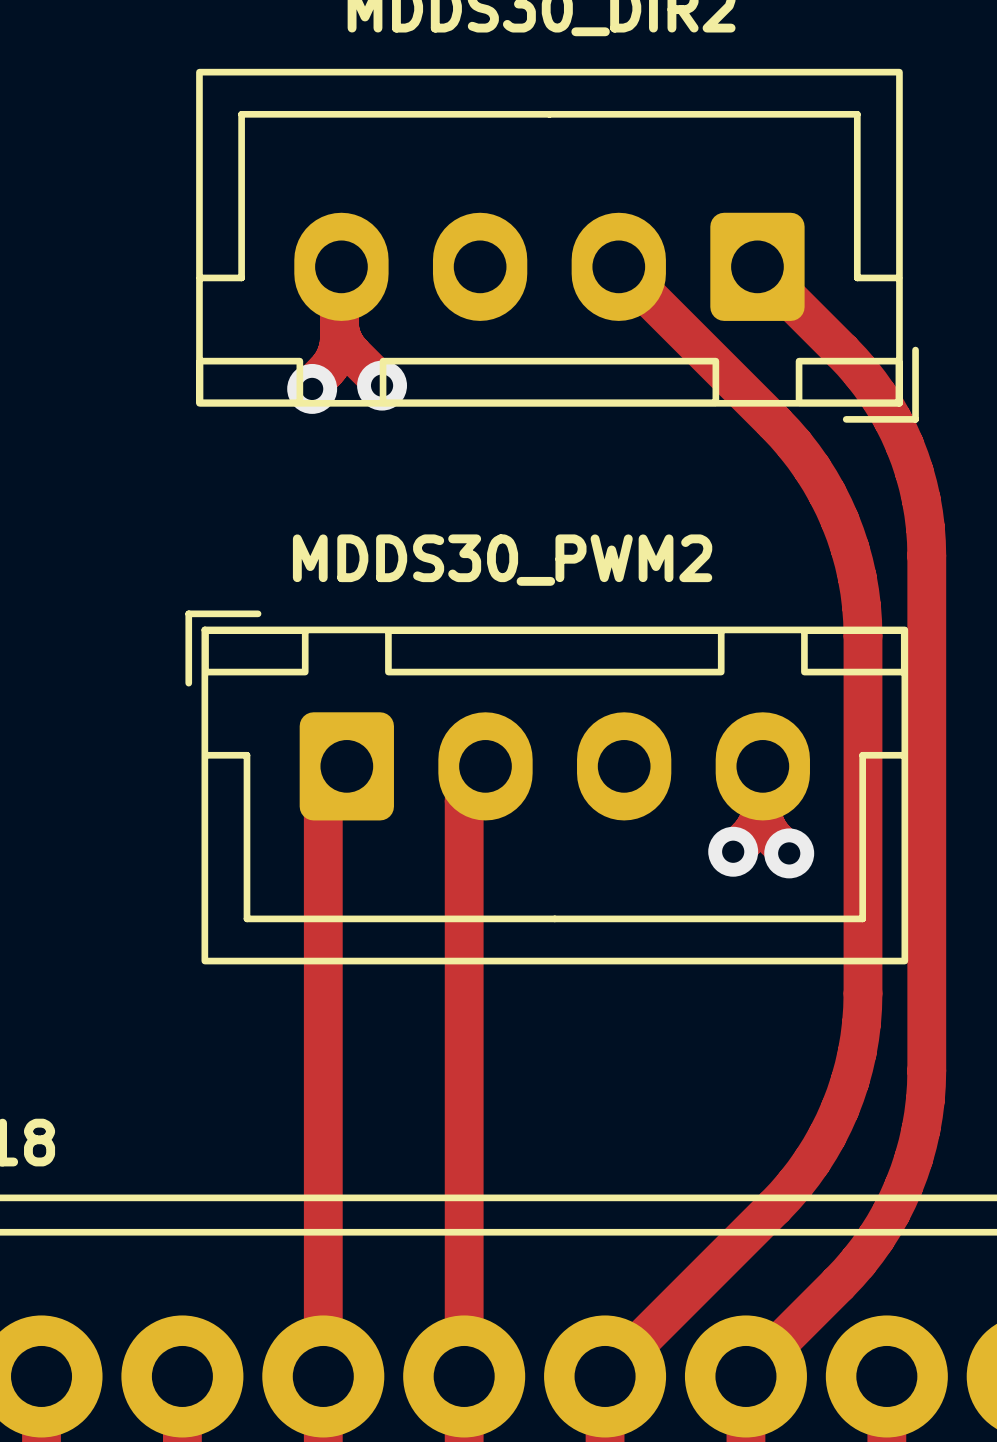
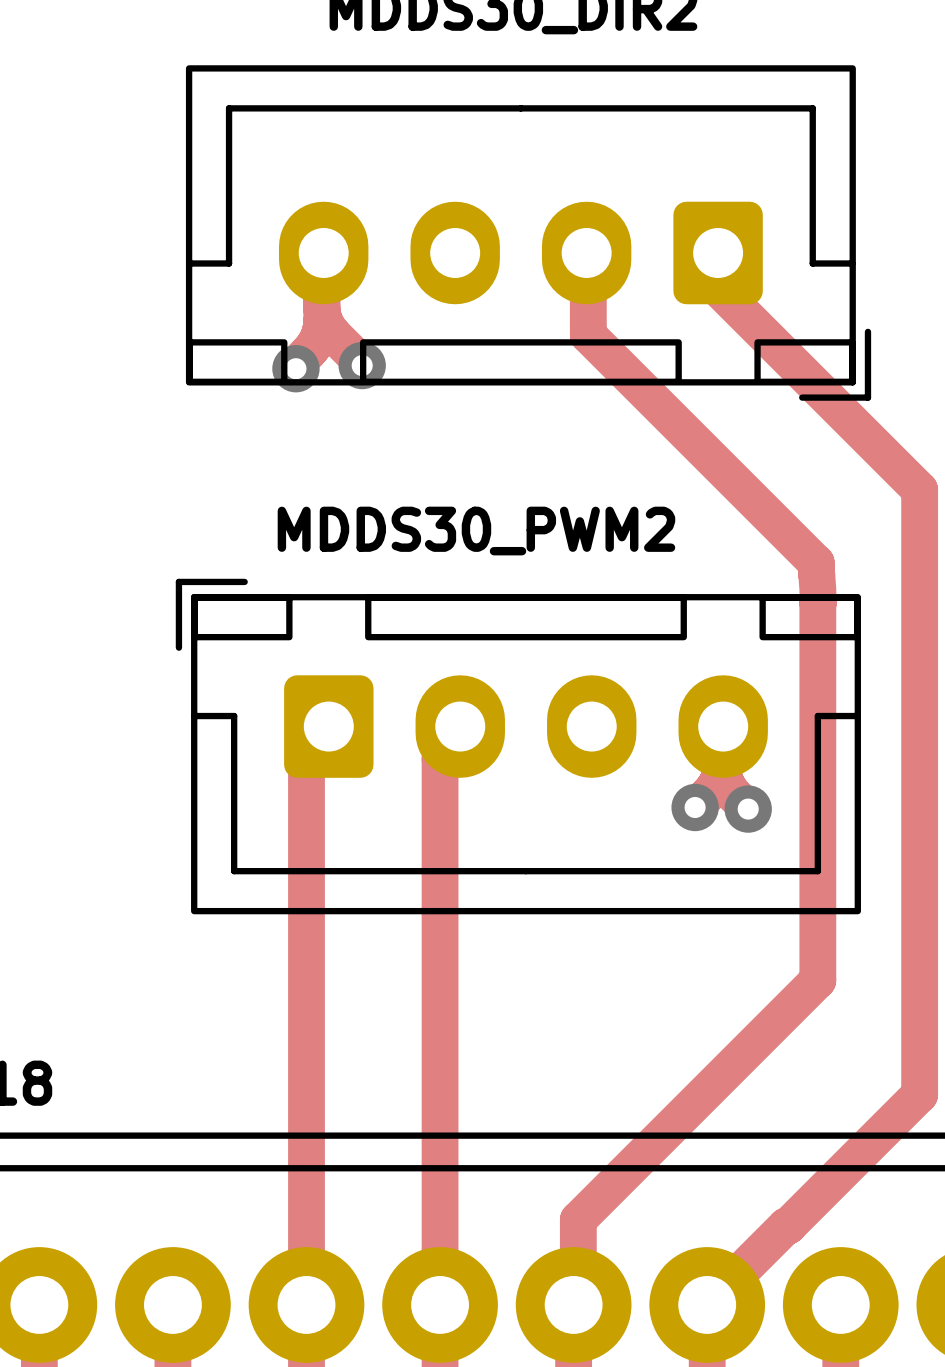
top track: (618, 266) (774, 422) (803, 456) (820, 480) (840, 520) (853, 562) (861, 606) -> (588, 254) (588, 335) (816, 562) (816, 574)
top track: (757, 266) (851, 361) (885, 407) (904, 445) (914, 471) (921, 499) (926, 541) (926, 1070) (923, 1114) (913, 1158) (891, 1212) (867, 1250) (829, 1293) -> (718, 252) (718, 288) (919, 489) (919, 1094) (786, 1226)
top track: (862, 636) (862, 1008) (857, 1052) (845, 1095) (827, 1135) (794, 1185) (605, 1376) -> (817, 603) (817, 980) (578, 1219) (578, 1300)

